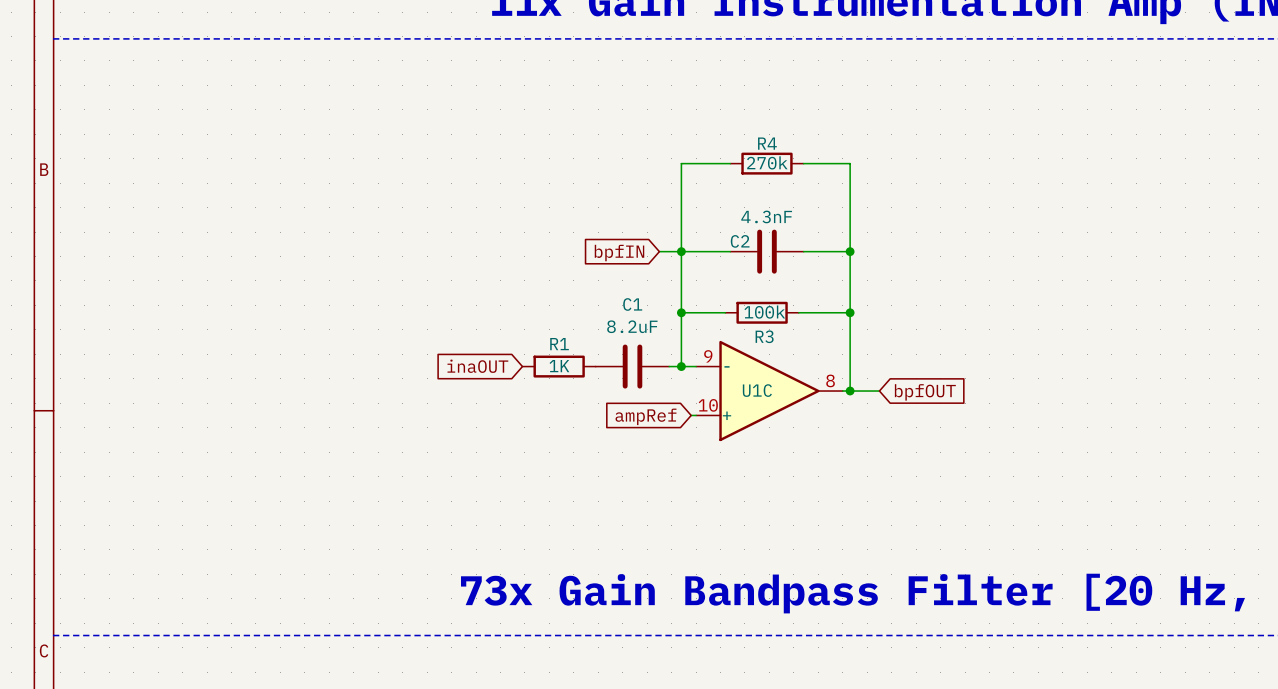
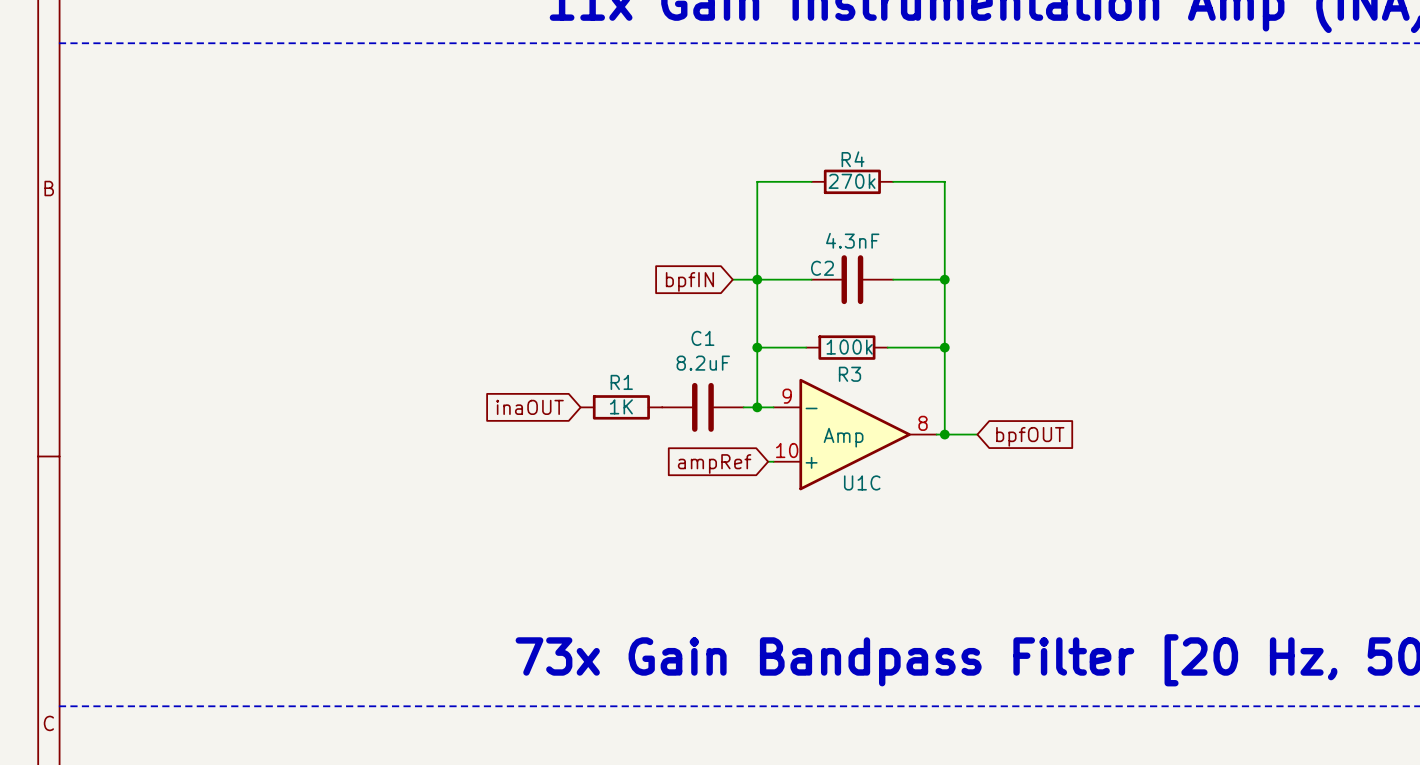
U1C name position: U1C (757, 390) -> U1C (862, 482)
U1C value: none -> Amp (843, 437)

